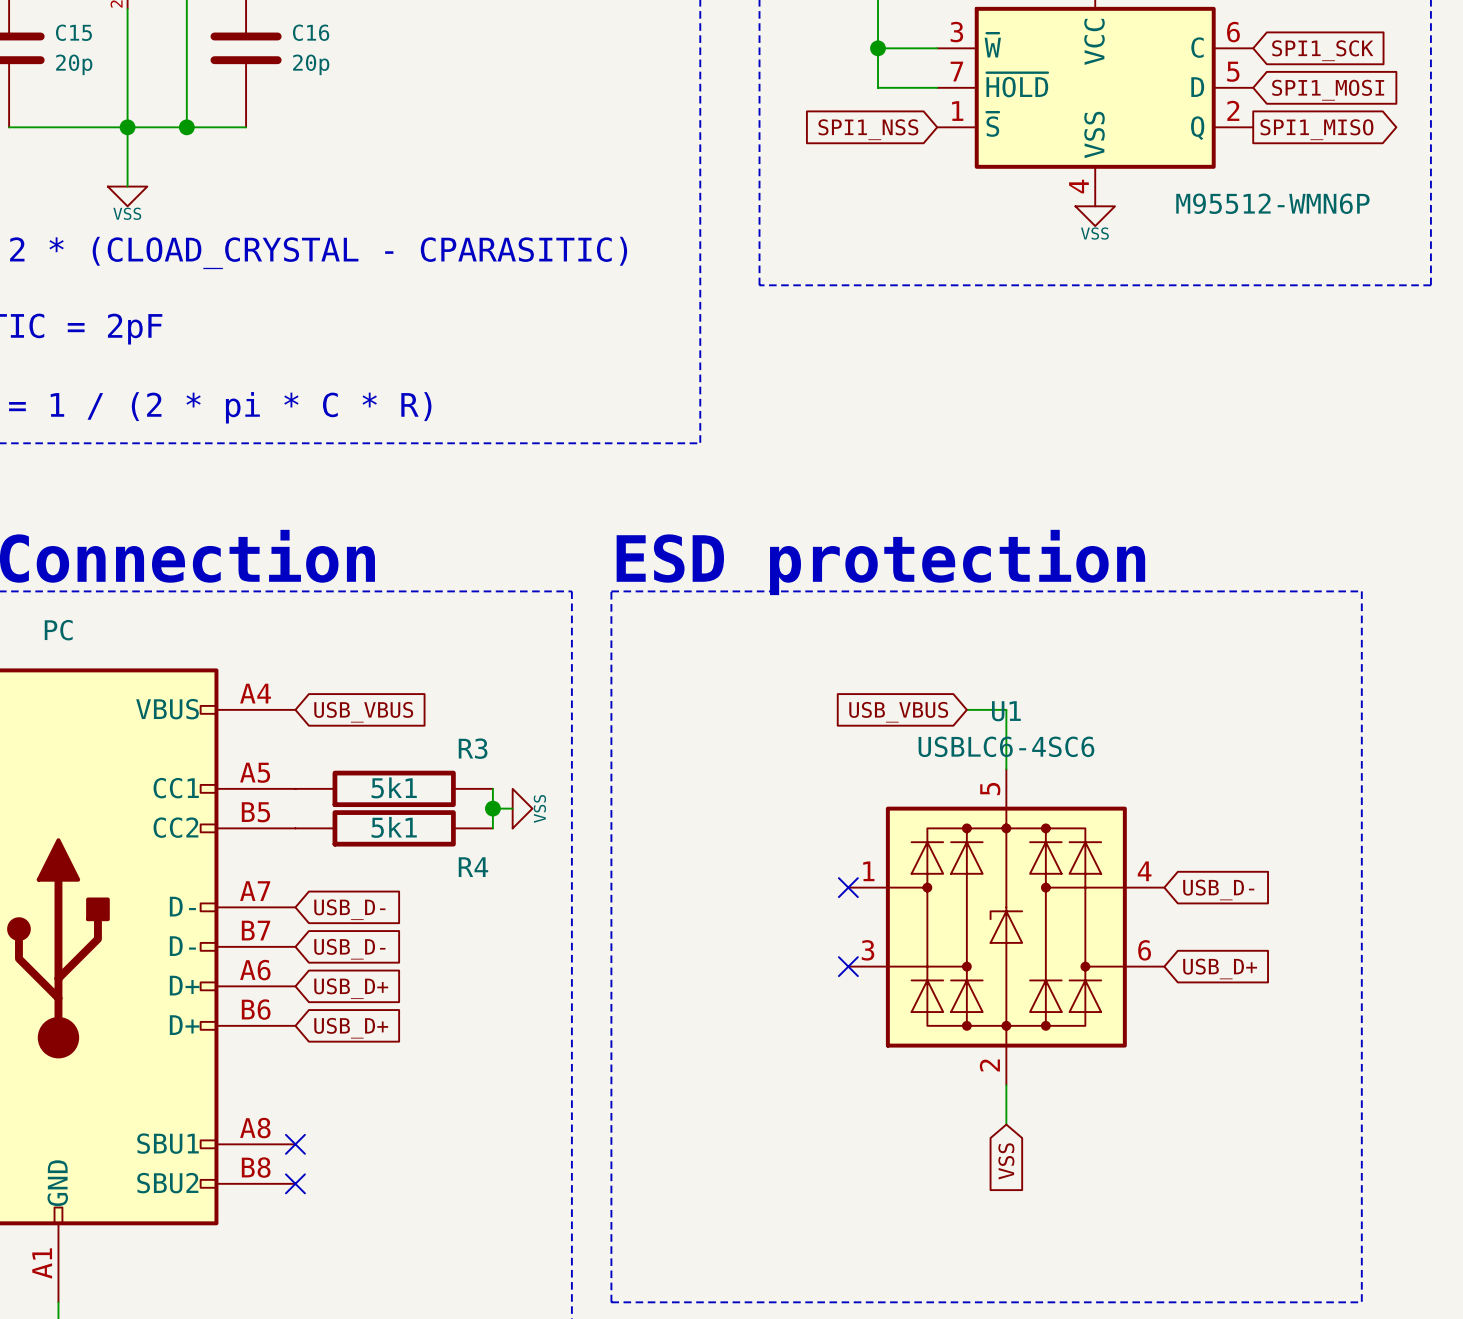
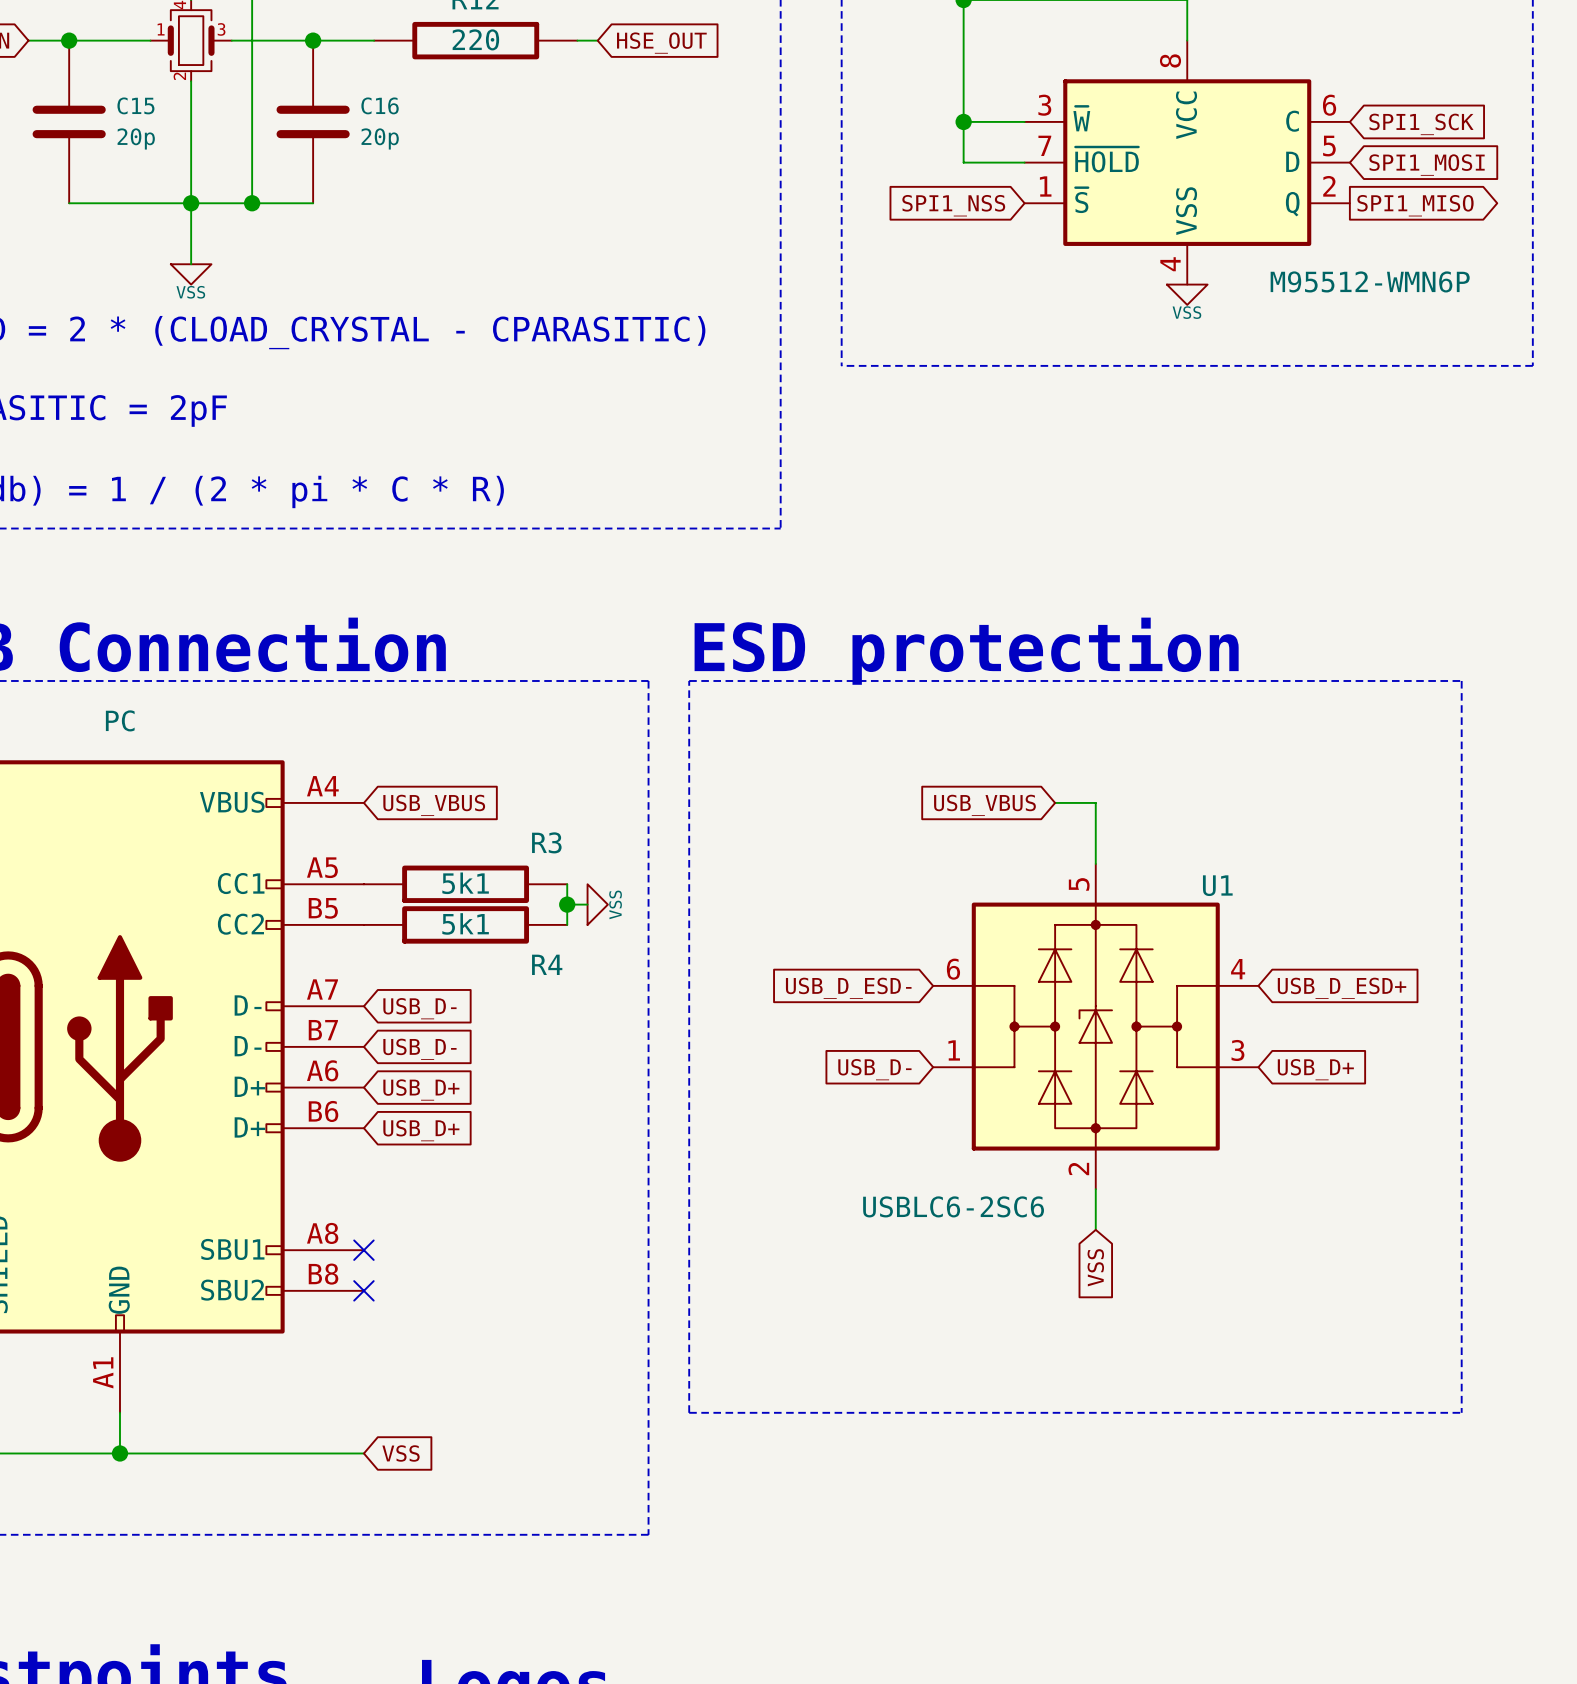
U1 name position: U1 (1006, 711) -> U1 (1217, 885)
U1 value: USBLC6-4SC6 (1006, 746) -> USBLC6-2SC6 (953, 1206)
U1 symbol: [848, 769, 1165, 1086] -> [933, 863, 1259, 1190]
no-connect mark: (848, 887) -> none
global label: none -> USB_D_ESD- (848, 988)
global label: USB_D- (1218, 889) -> USB_D_ESD+ (1342, 988)
no-connect mark: (848, 966) -> none
global label: none -> USB_D- (874, 1069)

